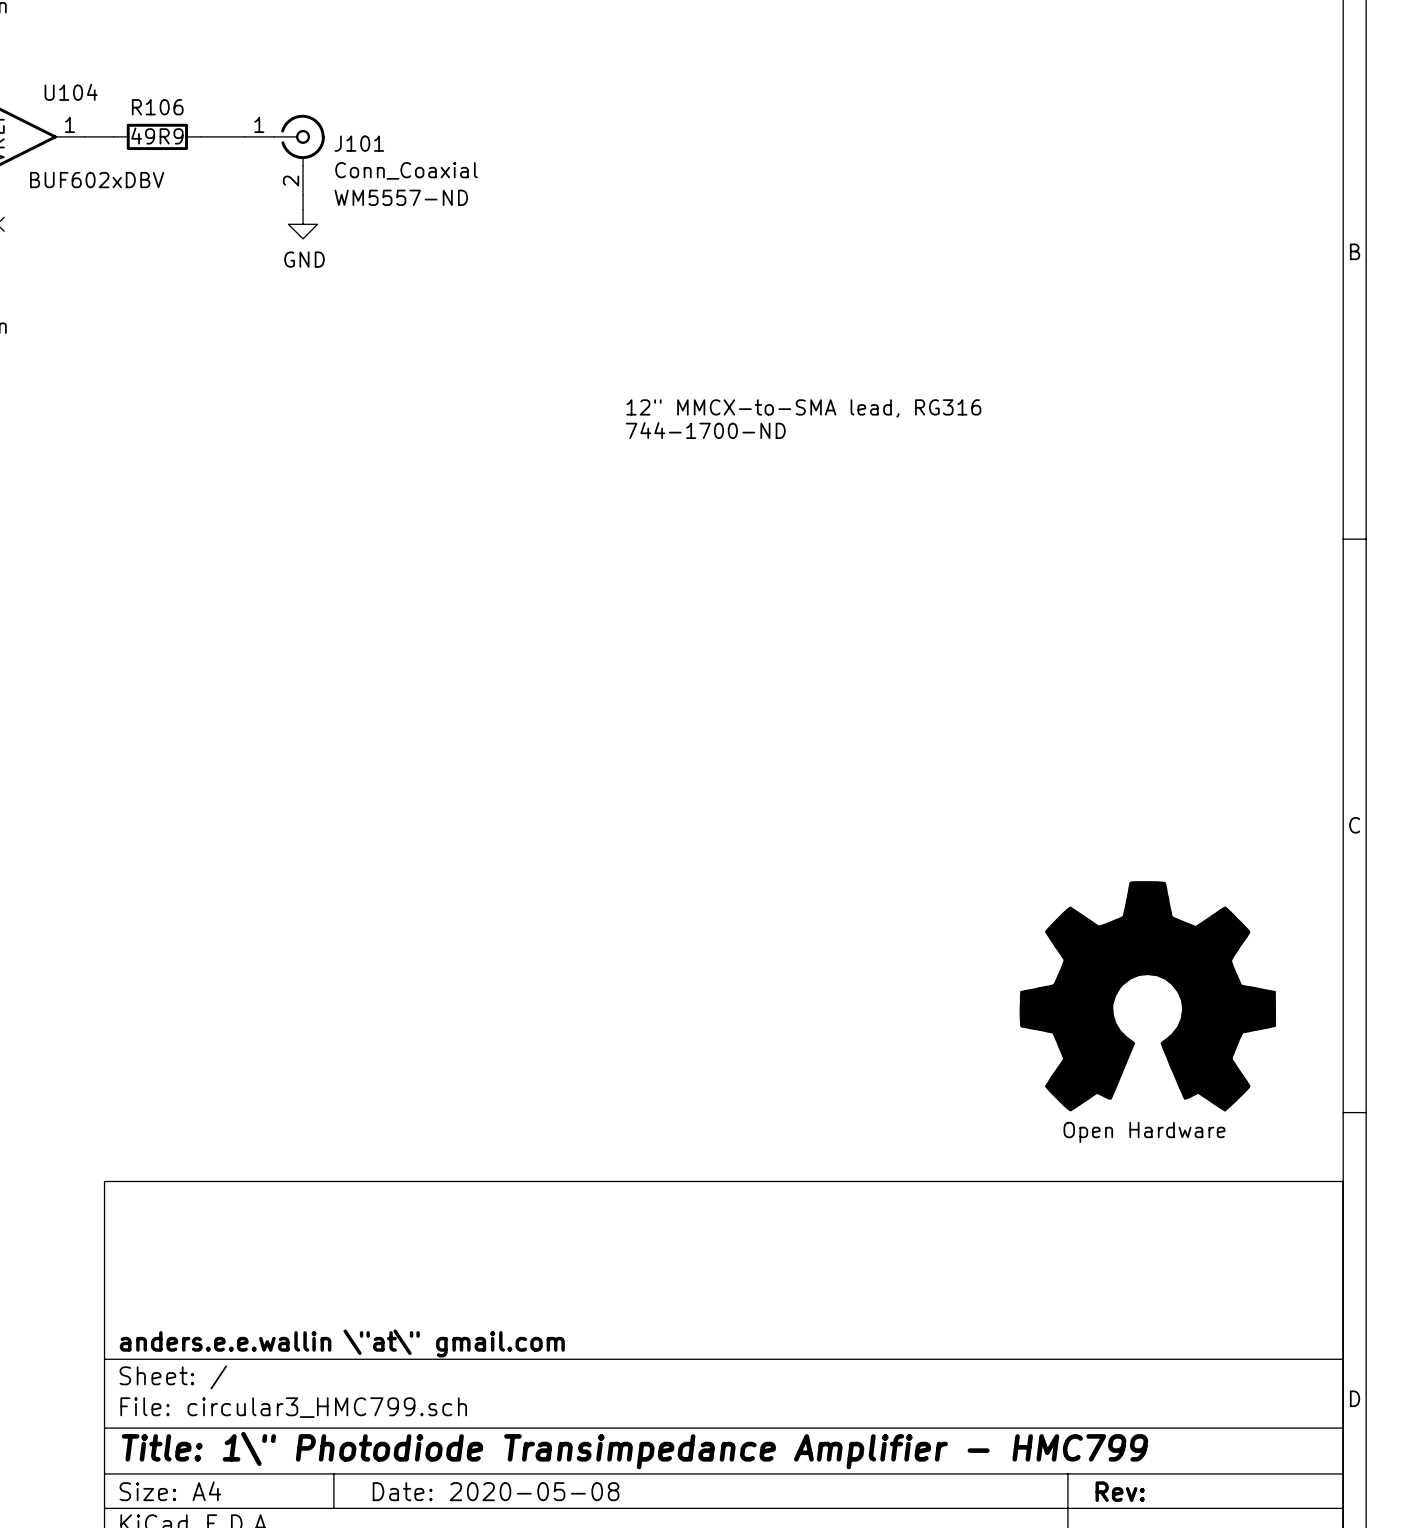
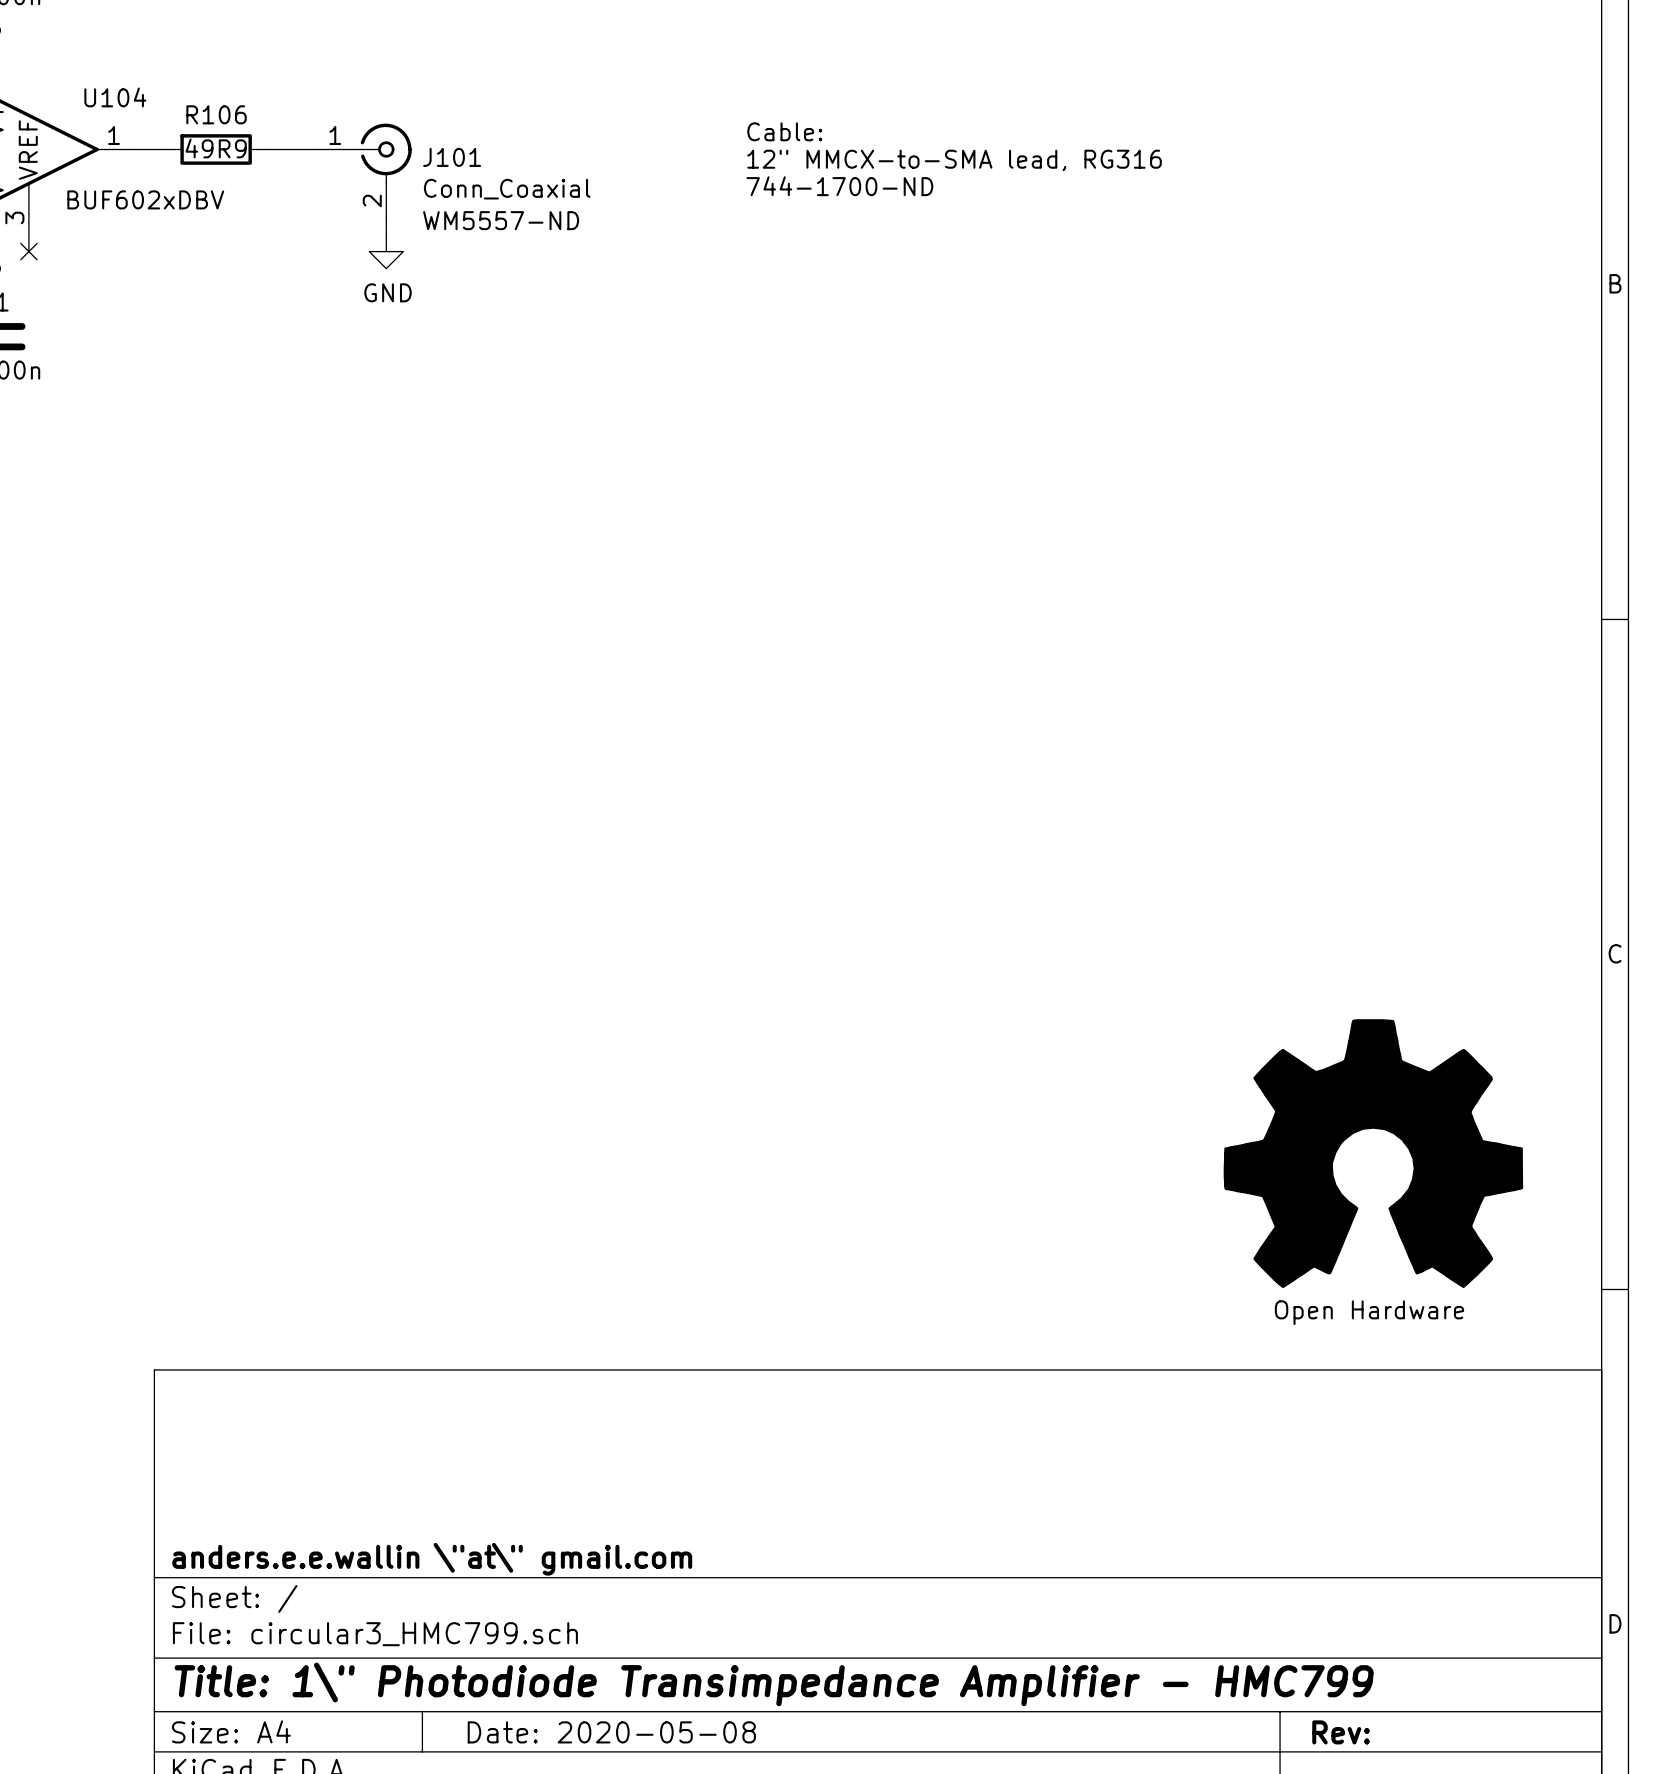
text: none -> Cable: (784, 131)
text position: 12" MMCX-to-SMA lead, RG316 (803, 408) -> 12" MMCX-to-SMA lead, RG316 (954, 160)
text position: 744-1700-ND (705, 430) -> 744-1700-ND (839, 186)

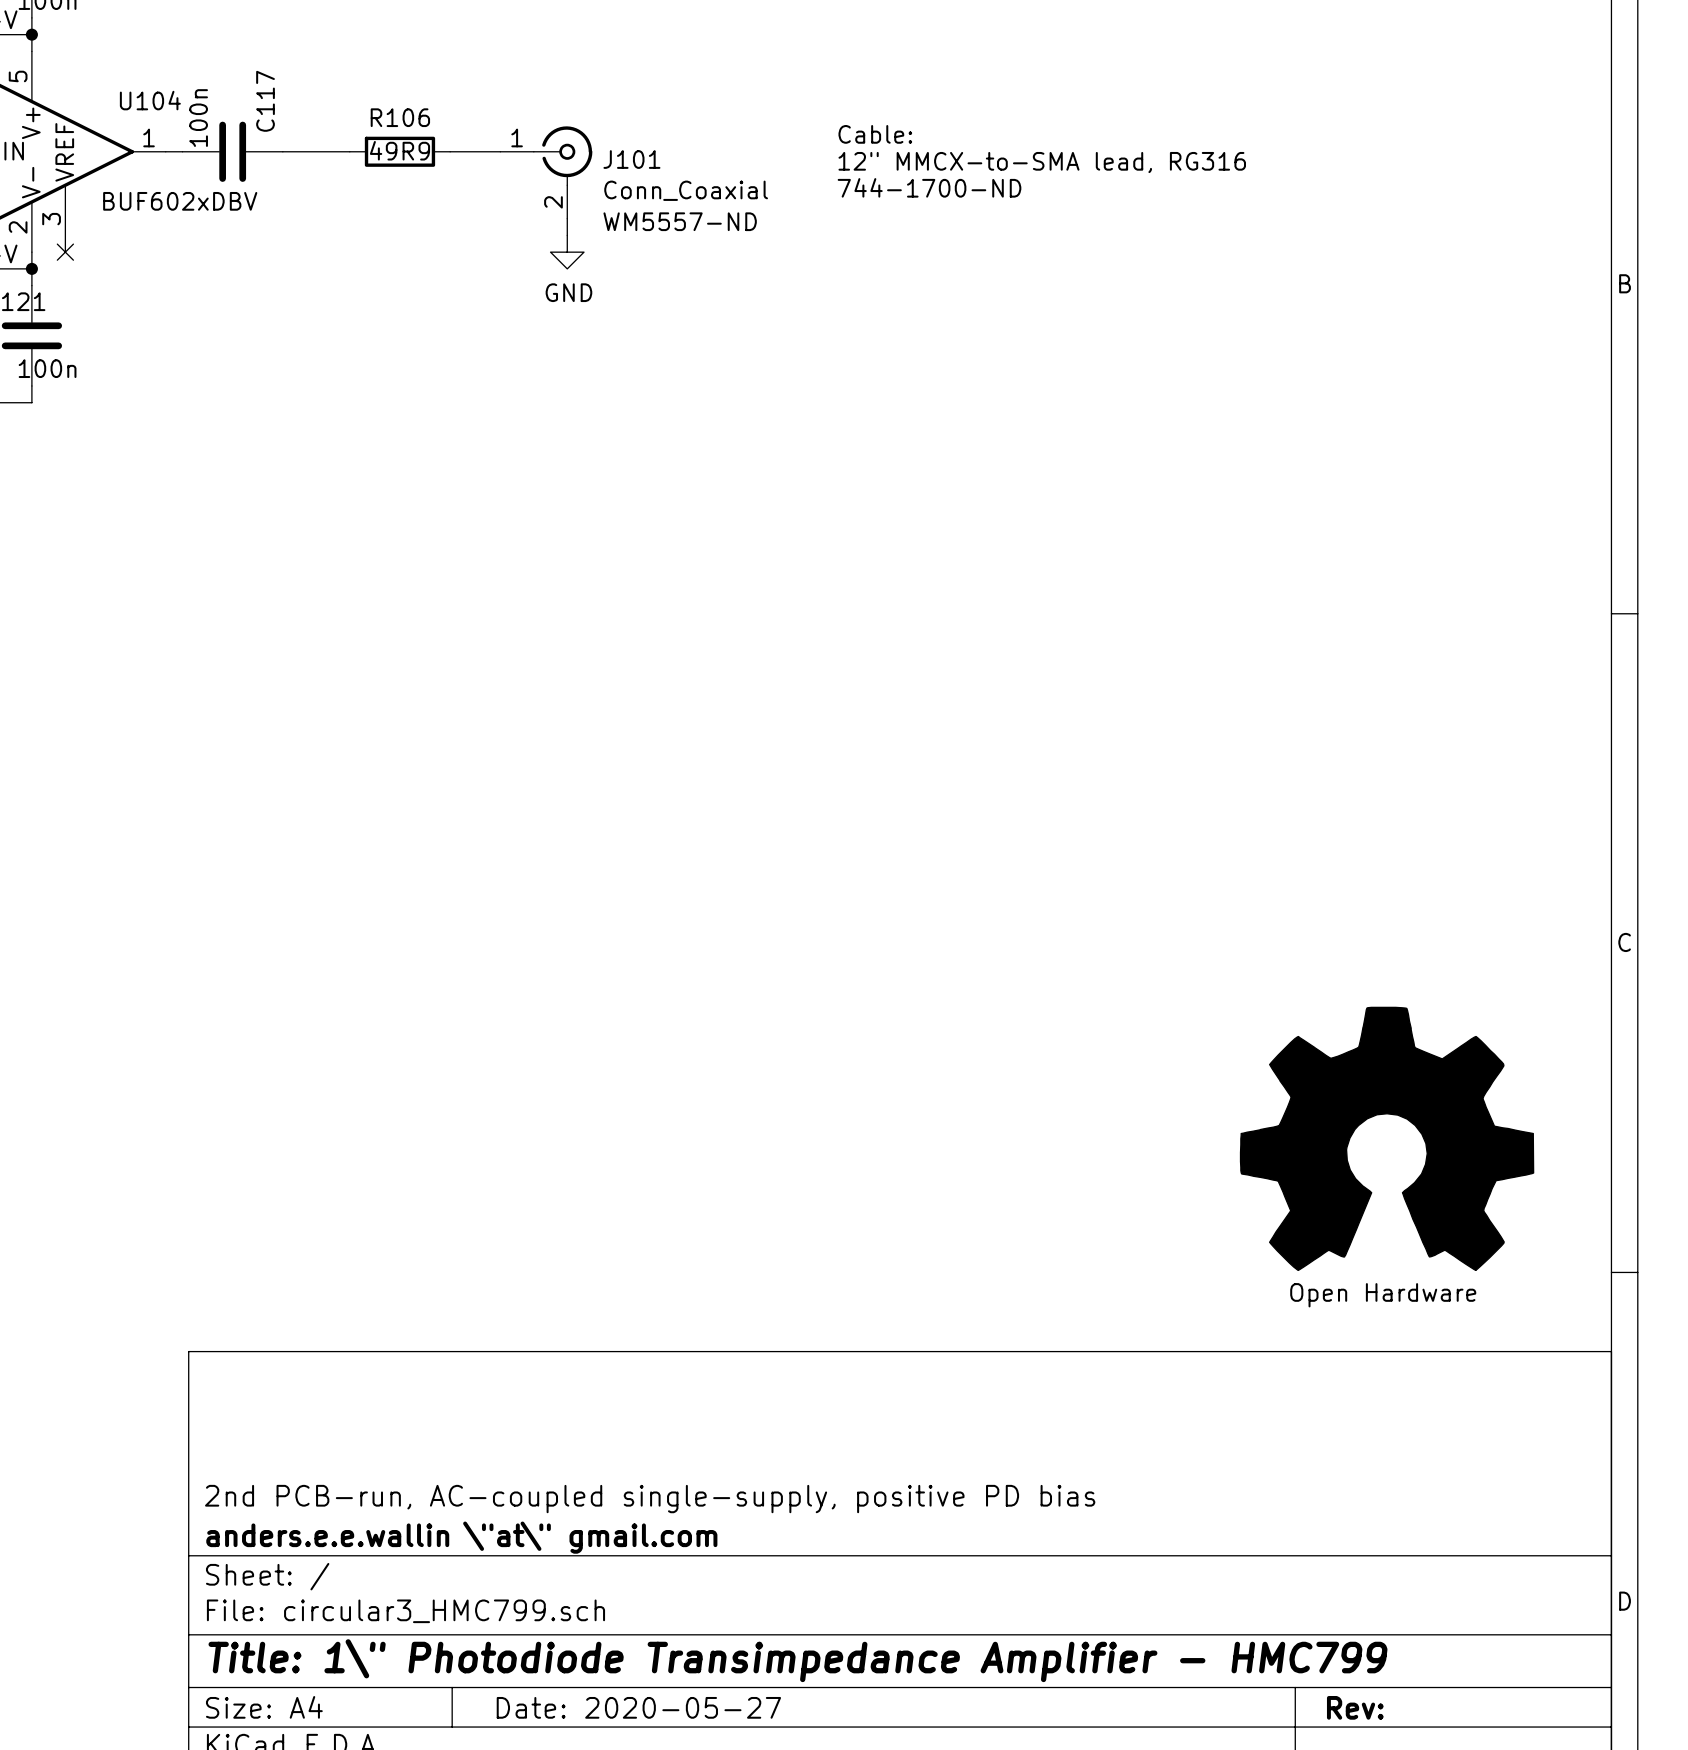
text position: Cable: (784, 131) -> Cable: (875, 134)
C117: none -> 100n (232, 151)
R106 position: (216, 149) -> (399, 151)
wire: none -> (450, 151) (500, 151)
text position: 12" MMCX-to-SMA lead, RG316 (954, 160) -> 12" MMCX-to-SMA lead, RG316 (1042, 162)
J101 position: (365, 170) -> (546, 172)
text position: 744-1700-ND (839, 186) -> 744-1700-ND (929, 187)
wire: (386, 217) (386, 234) -> (567, 218) (567, 235)
text position: WM5557-ND (501, 220) -> WM5557-ND (680, 221)
power symbol position: GND (386, 251) -> GND (567, 252)
title block: none -> 2nd PCB-run, AC-coupled single-supply, positive PD bias (650, 1499)
title block: Date: 2020-05-08 (611, 1732) -> Date: 2020-05-27 (638, 1707)

